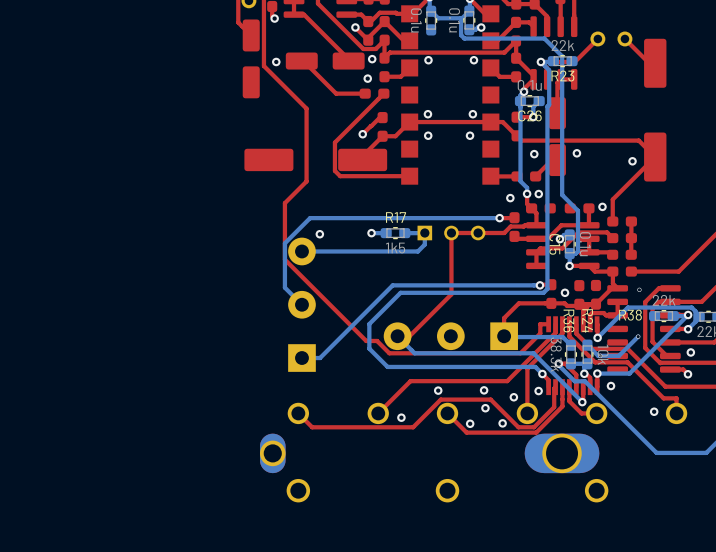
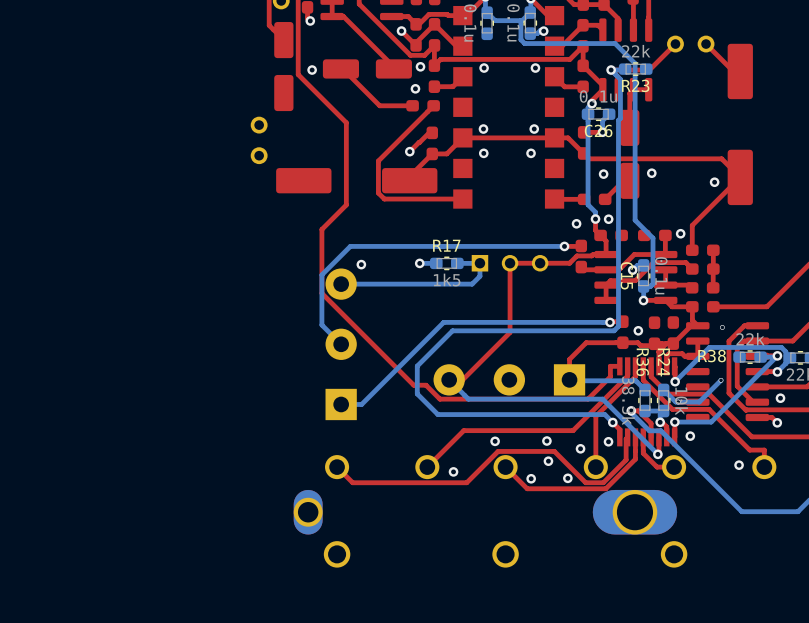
part: none -> (259, 140)

